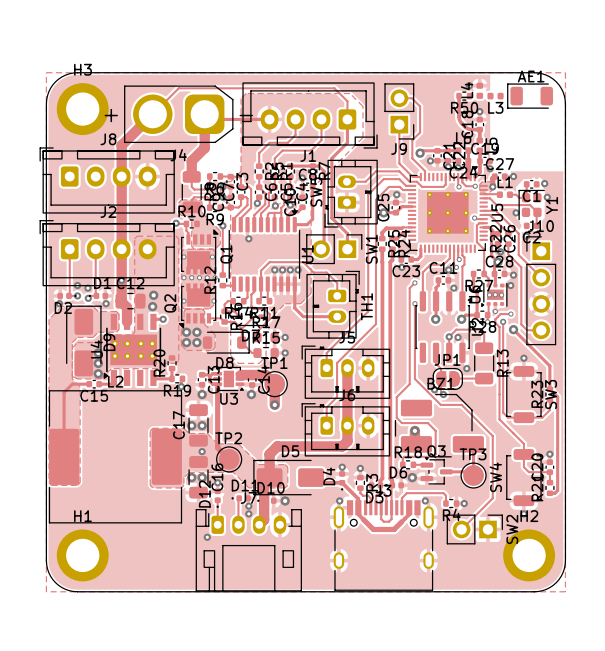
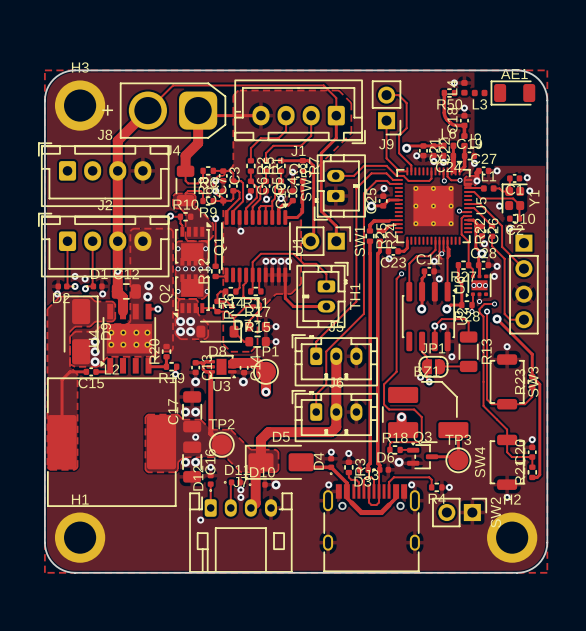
via: (459, 259) -> none
via: none -> (441, 253)
via: (456, 267) -> none
track: (414, 303) (414, 378) (440, 404) (461, 404) (492, 436) (492, 498) (461, 529) -> none
via: (414, 303) -> none

